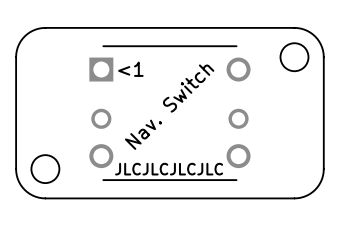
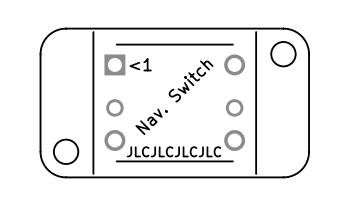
line: none -> (93, 32) (93, 173)
line: none -> (256, 32) (256, 173)

